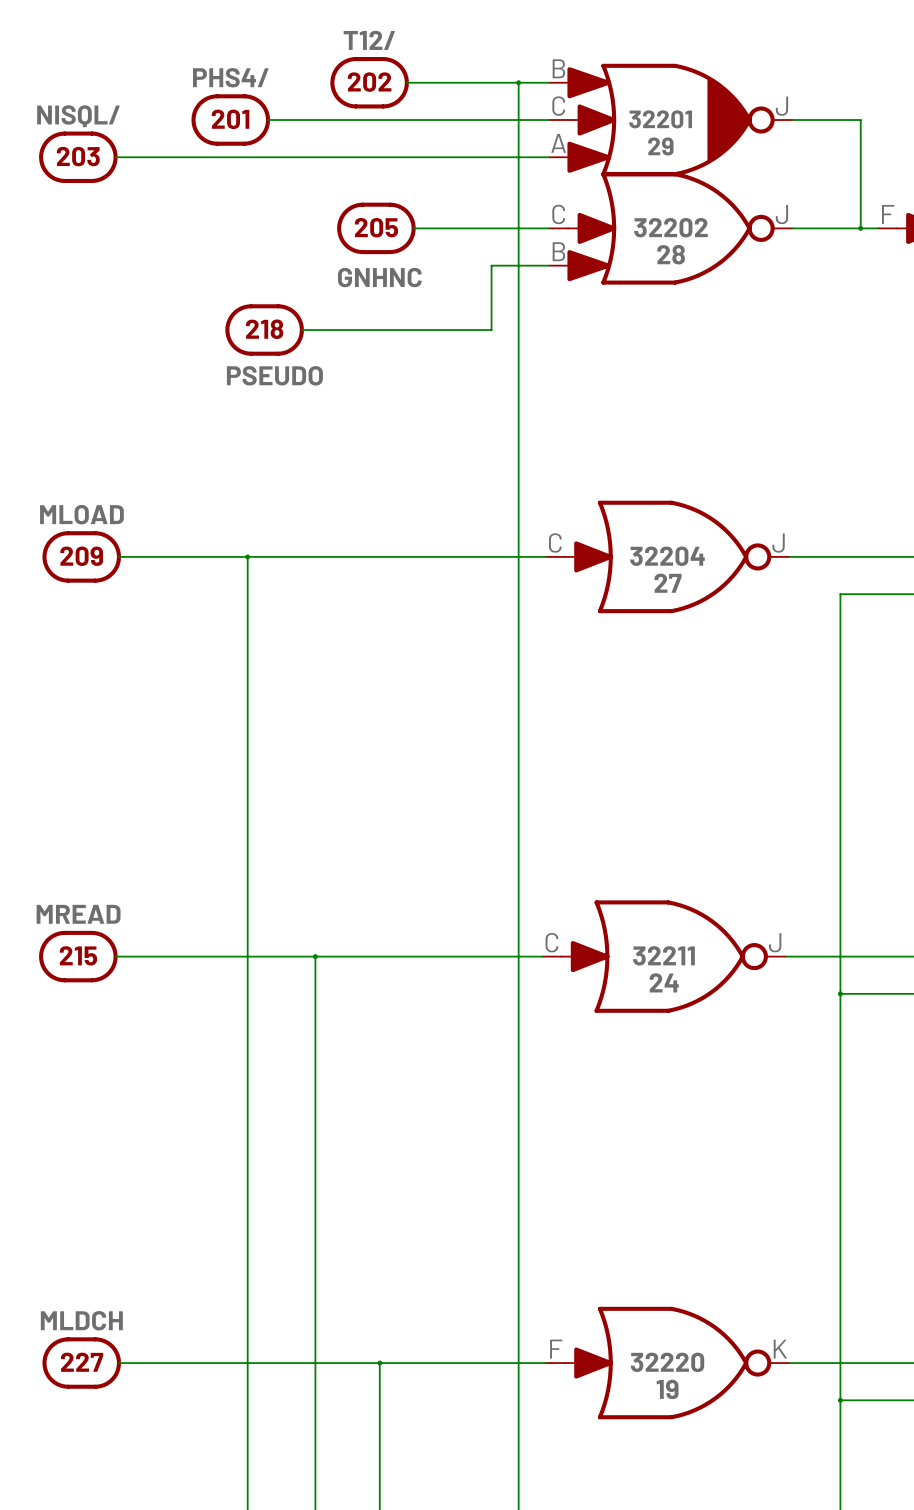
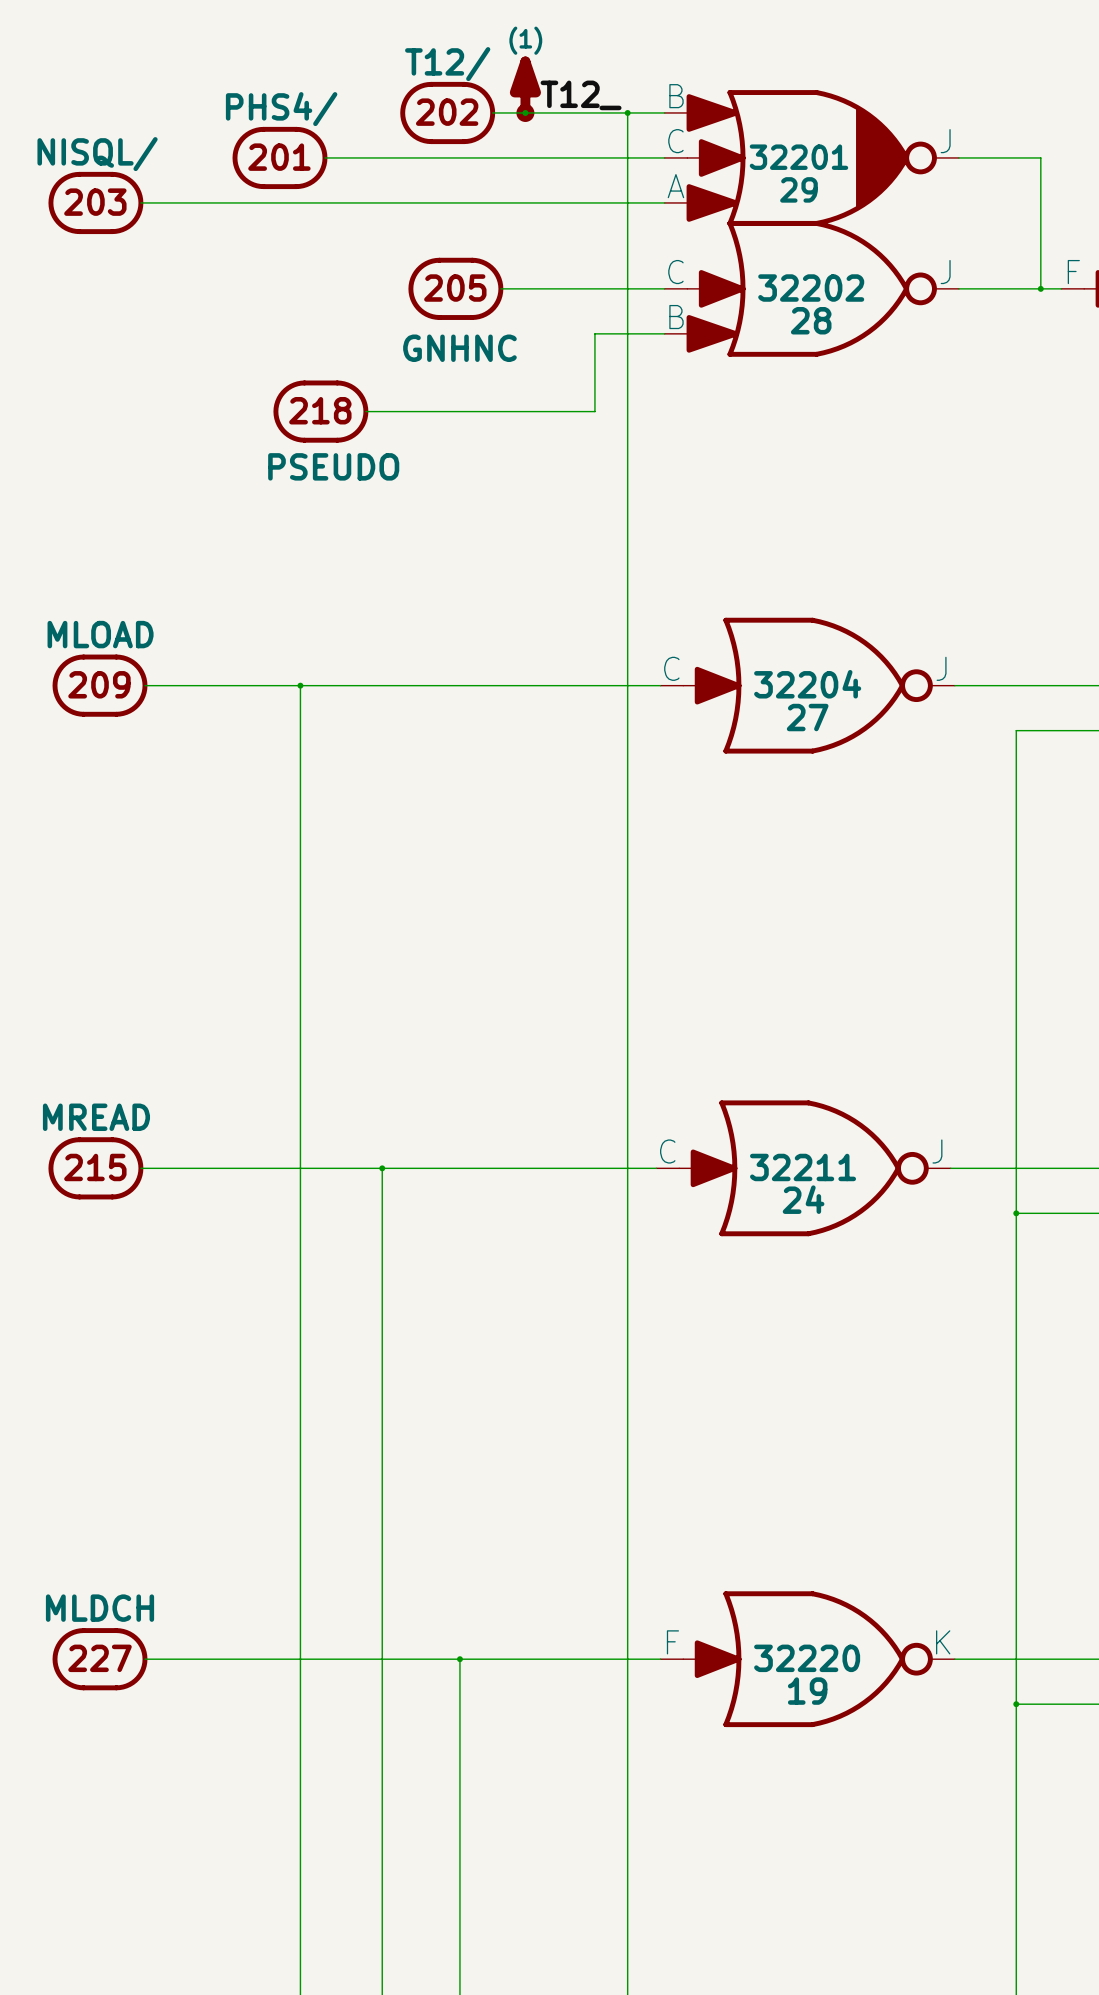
part: none -> (525, 89)
label: none -> T12_ (581, 95)
junction: none -> (525, 112)

